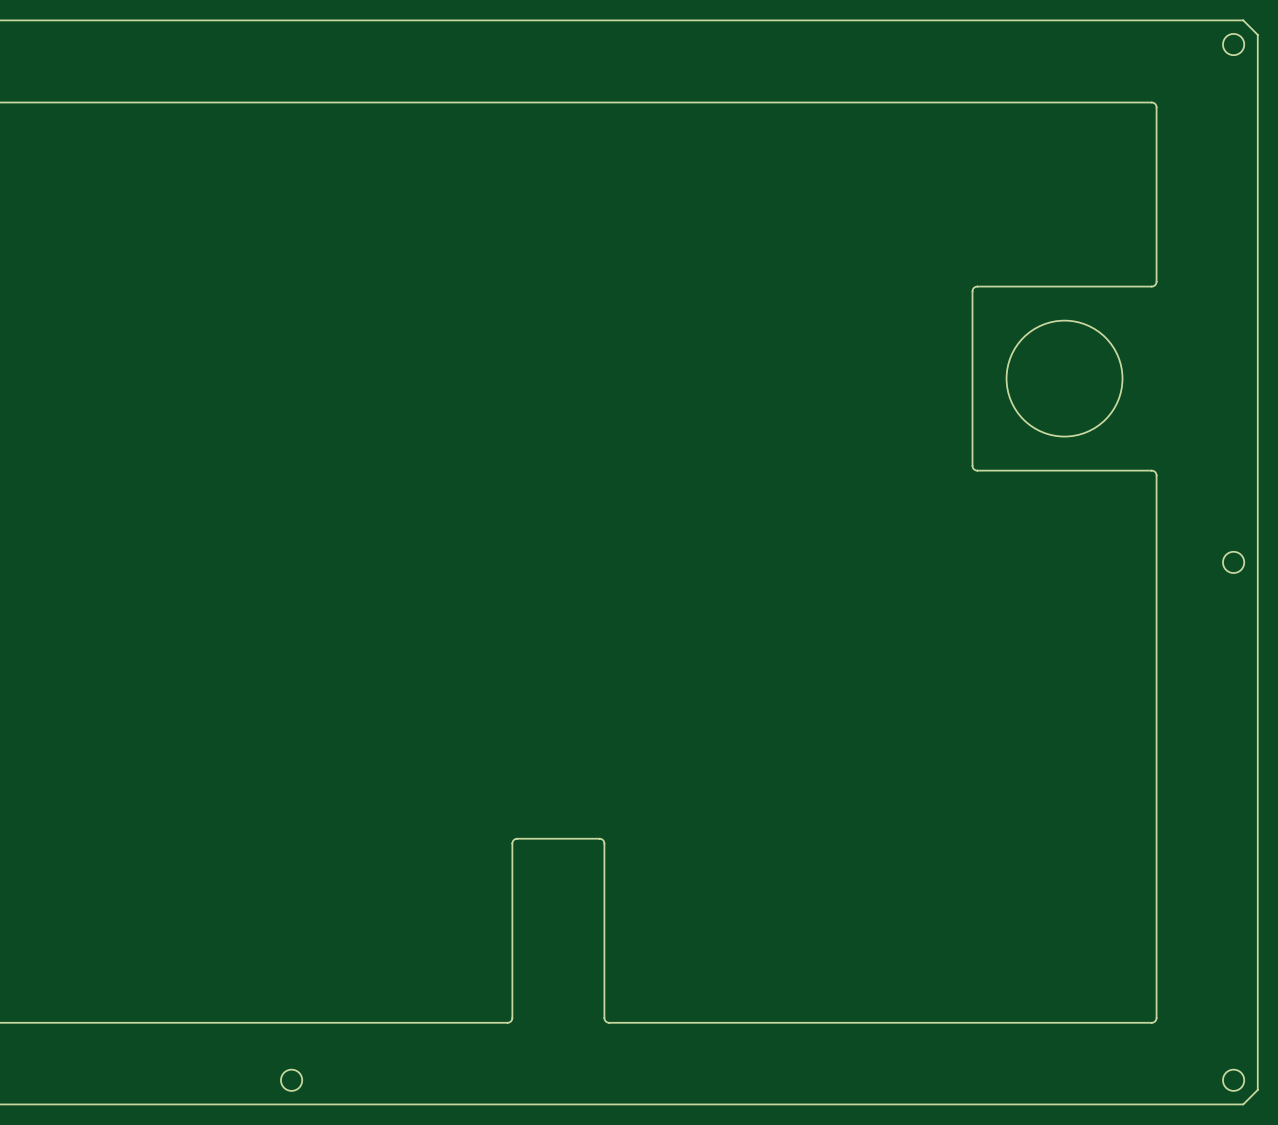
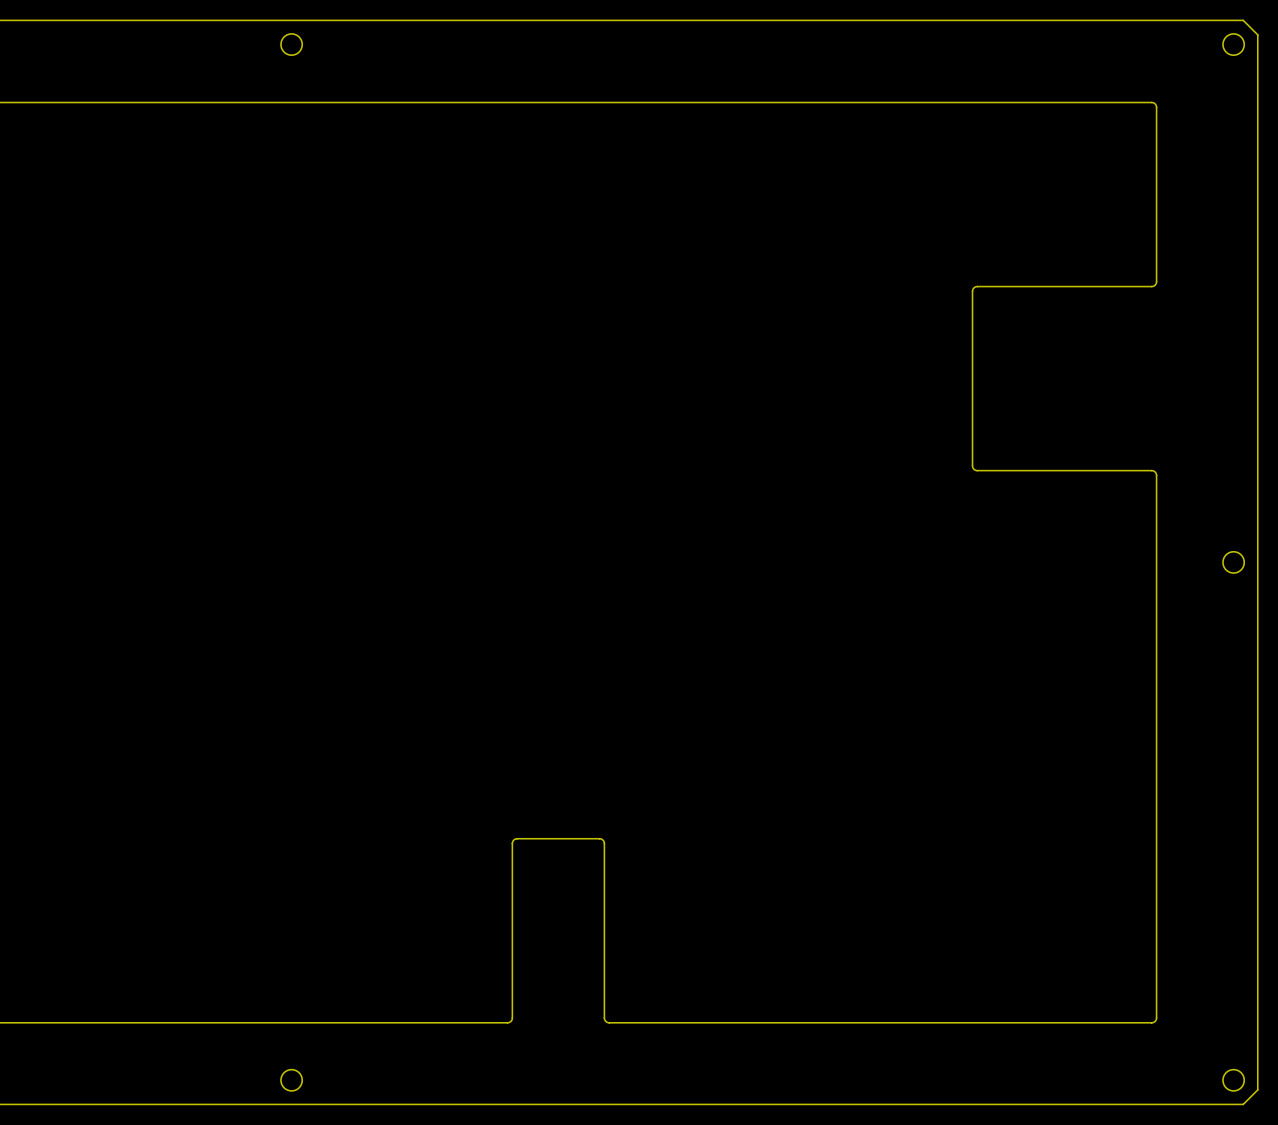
drawing: none -> [280, 33, 303, 56]
round board edge: [1006, 320, 1123, 438] -> none

